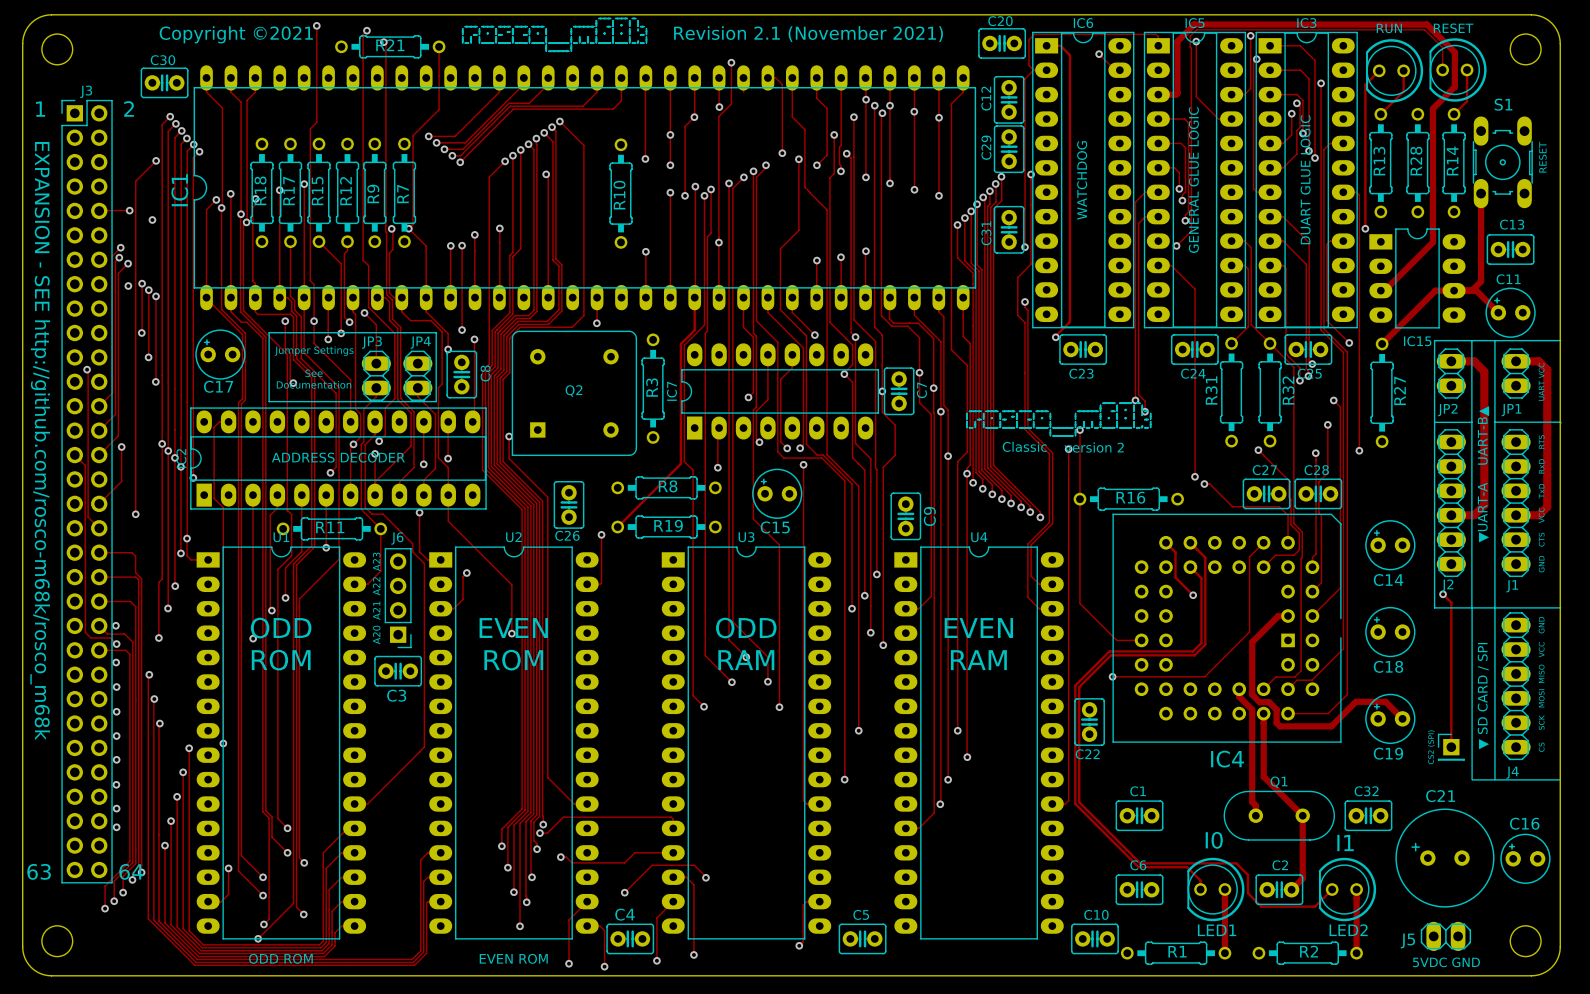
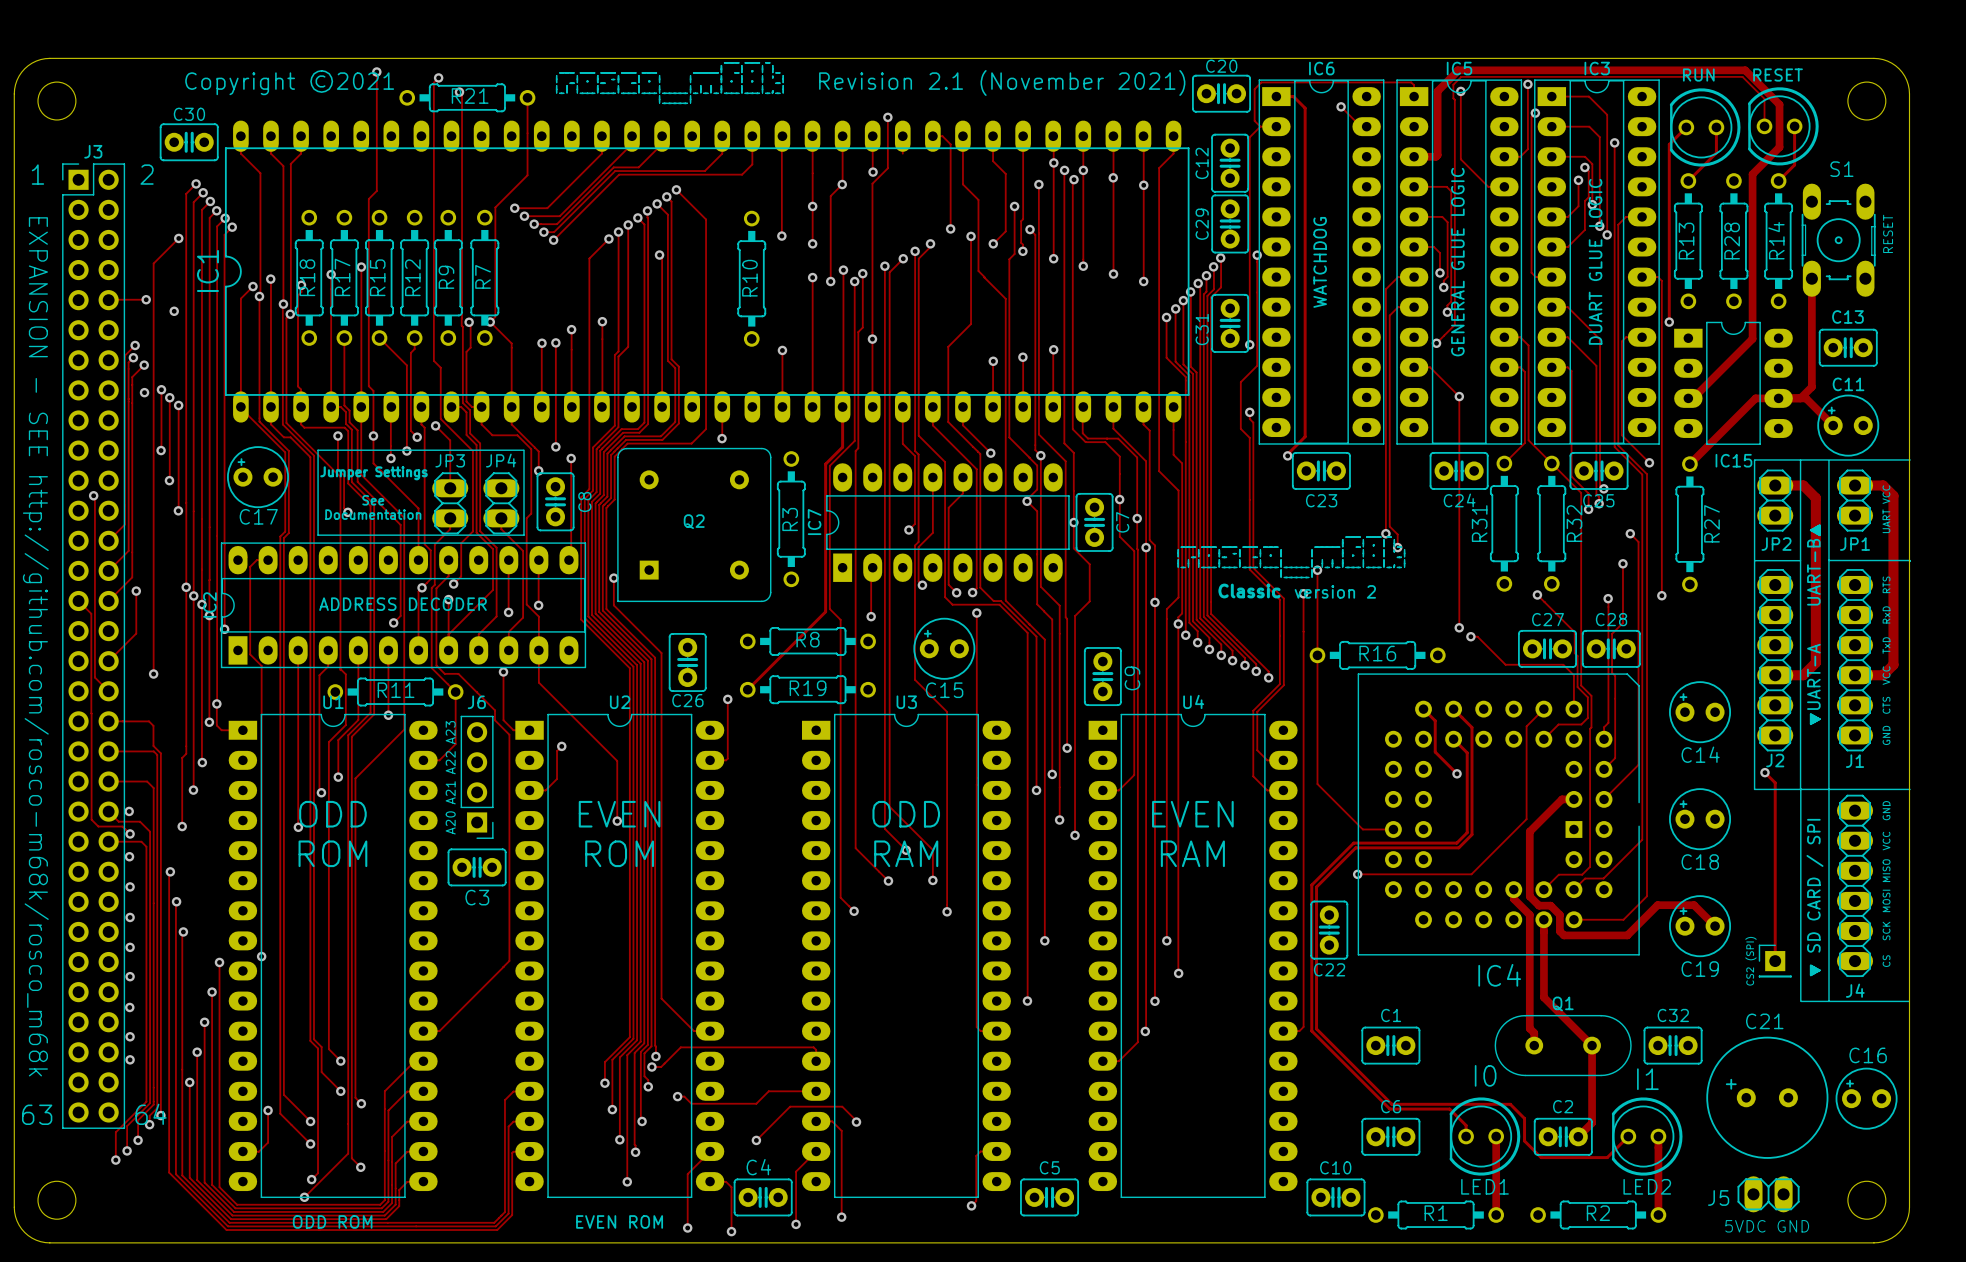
via: none -> (1459, 396)

